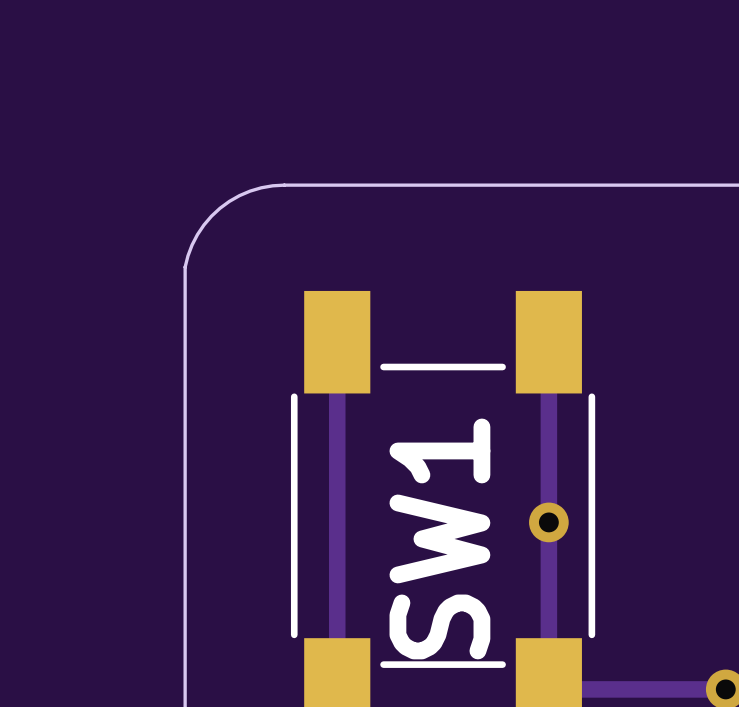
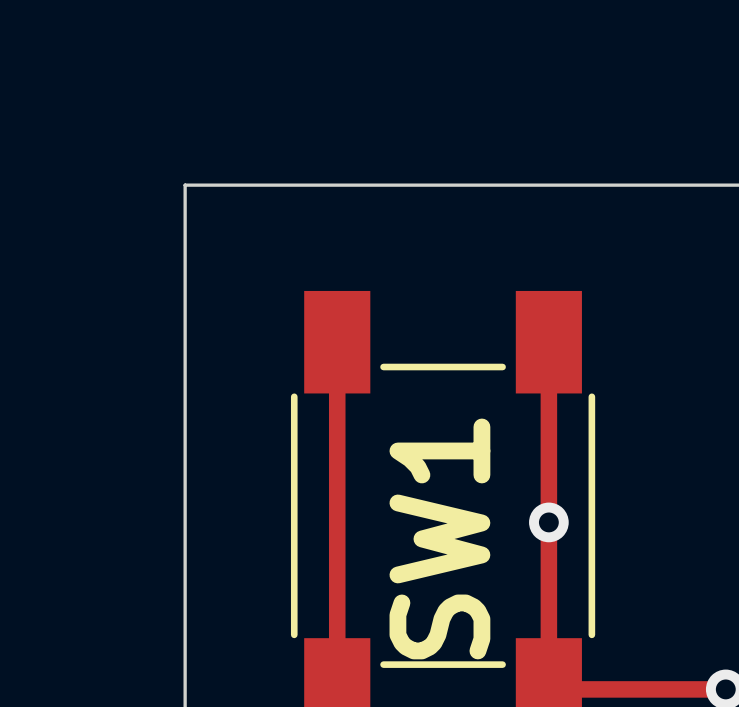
board edge: (284, 185) (250, 191) (220, 208) (197, 234) (185, 267) -> (284, 185) (185, 185) (185, 267)

